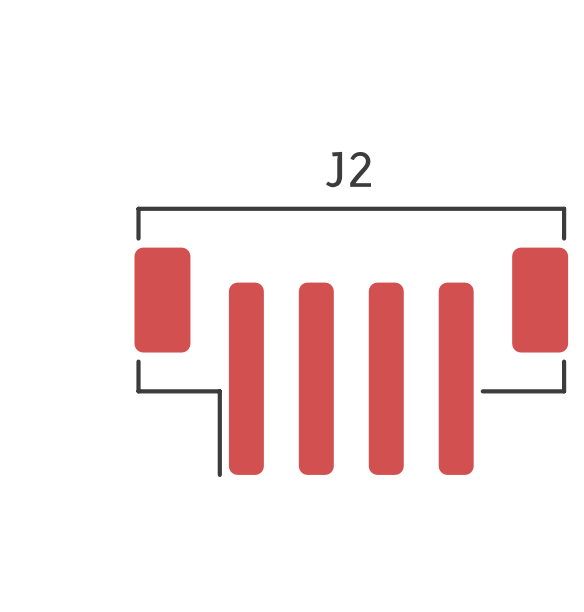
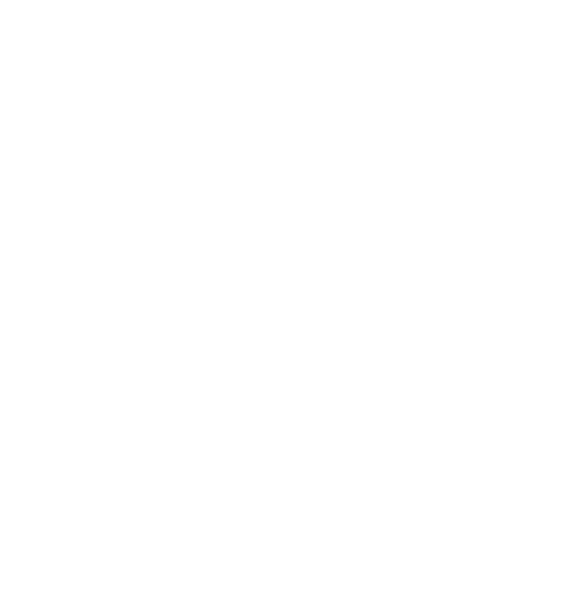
J2: (351, 341) -> none

